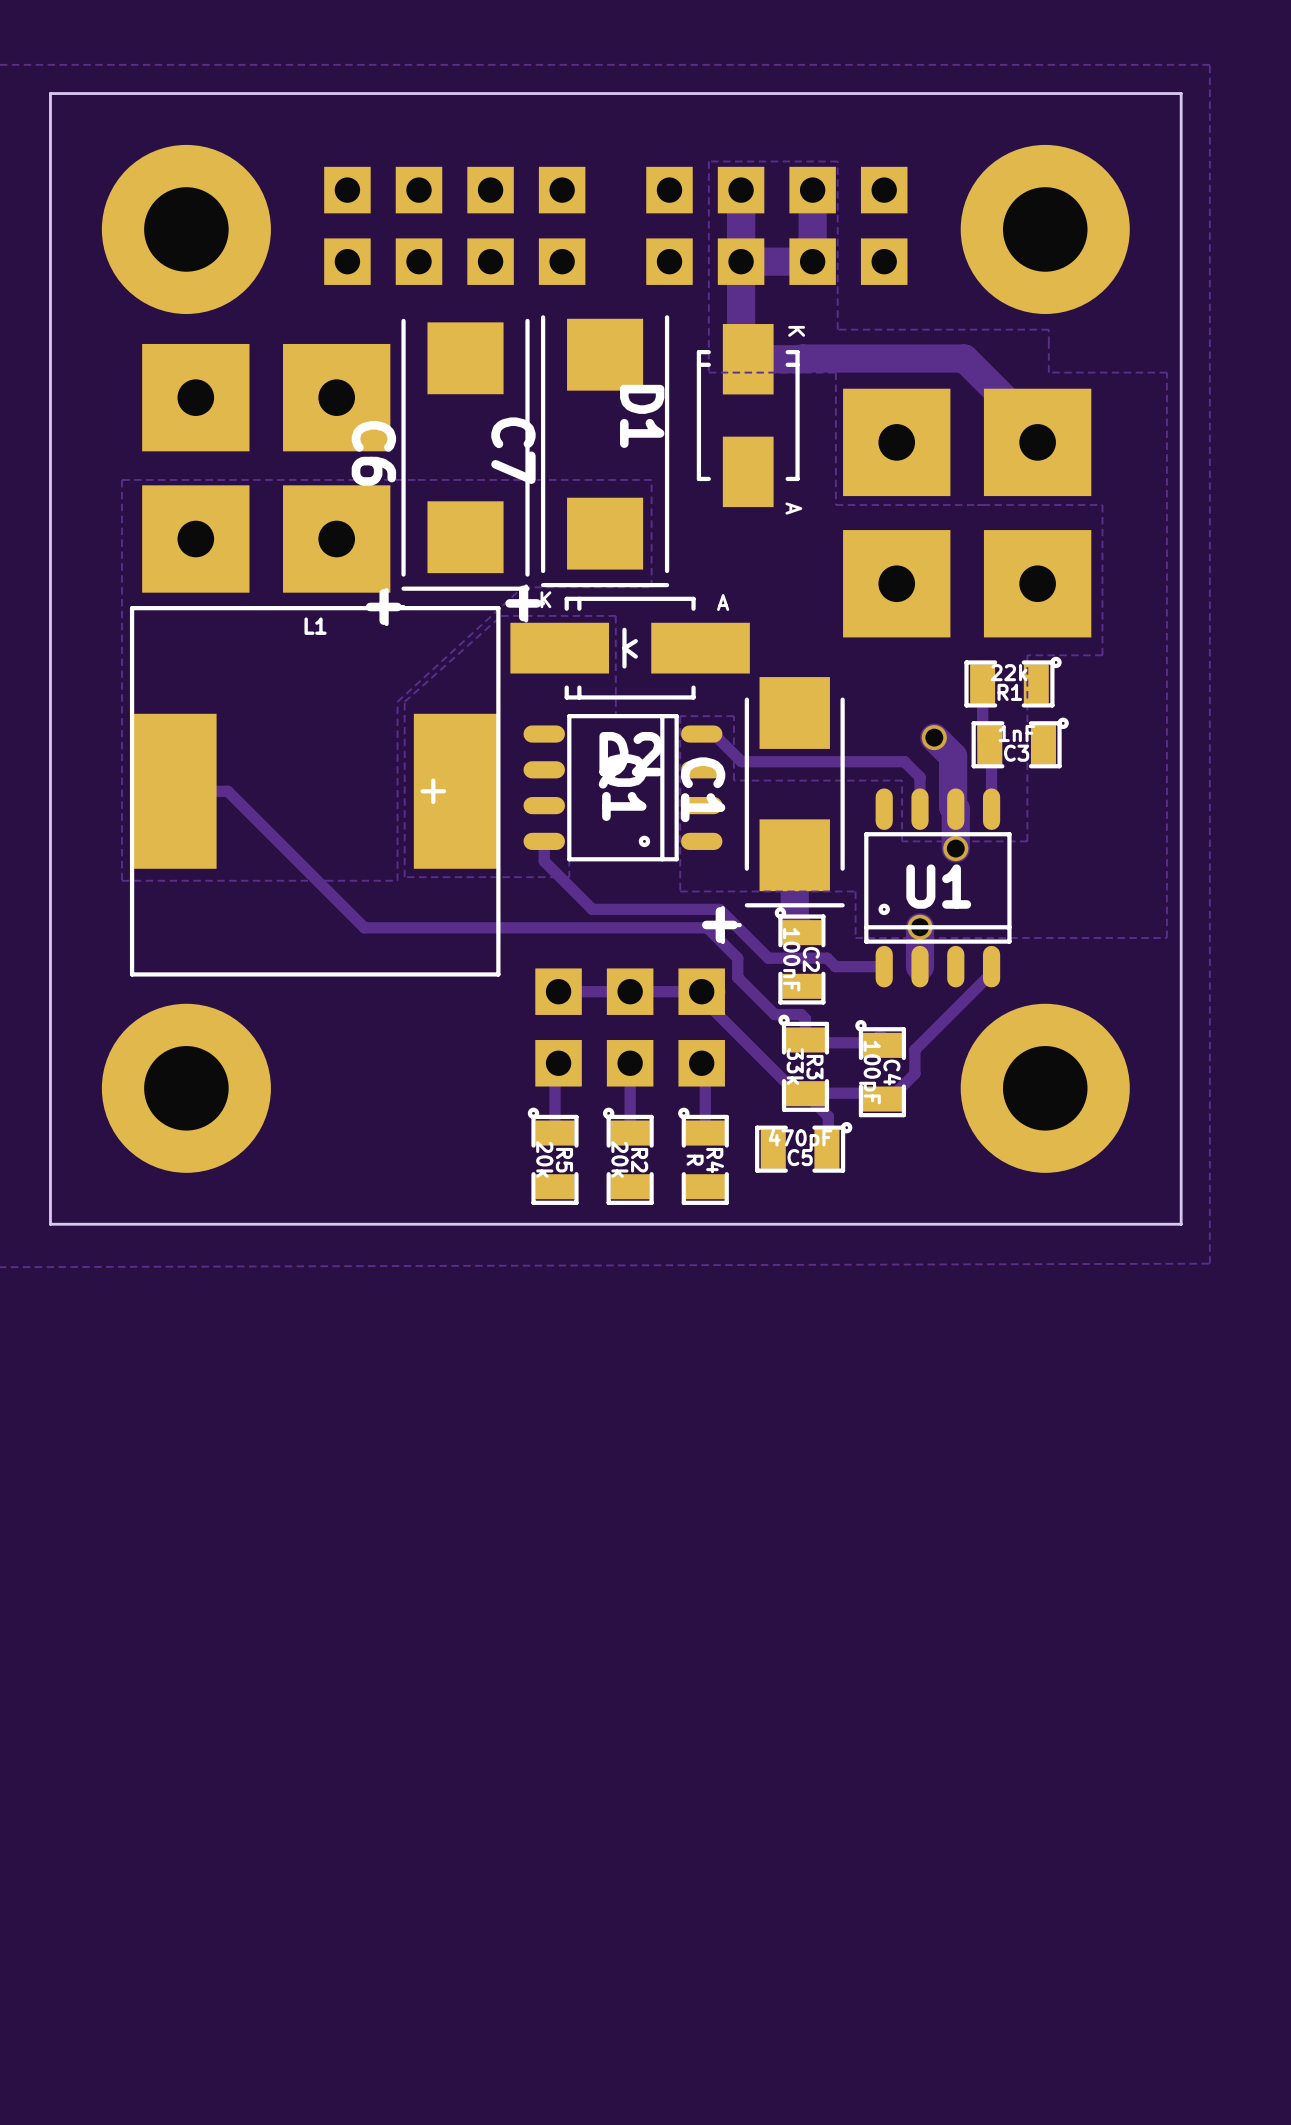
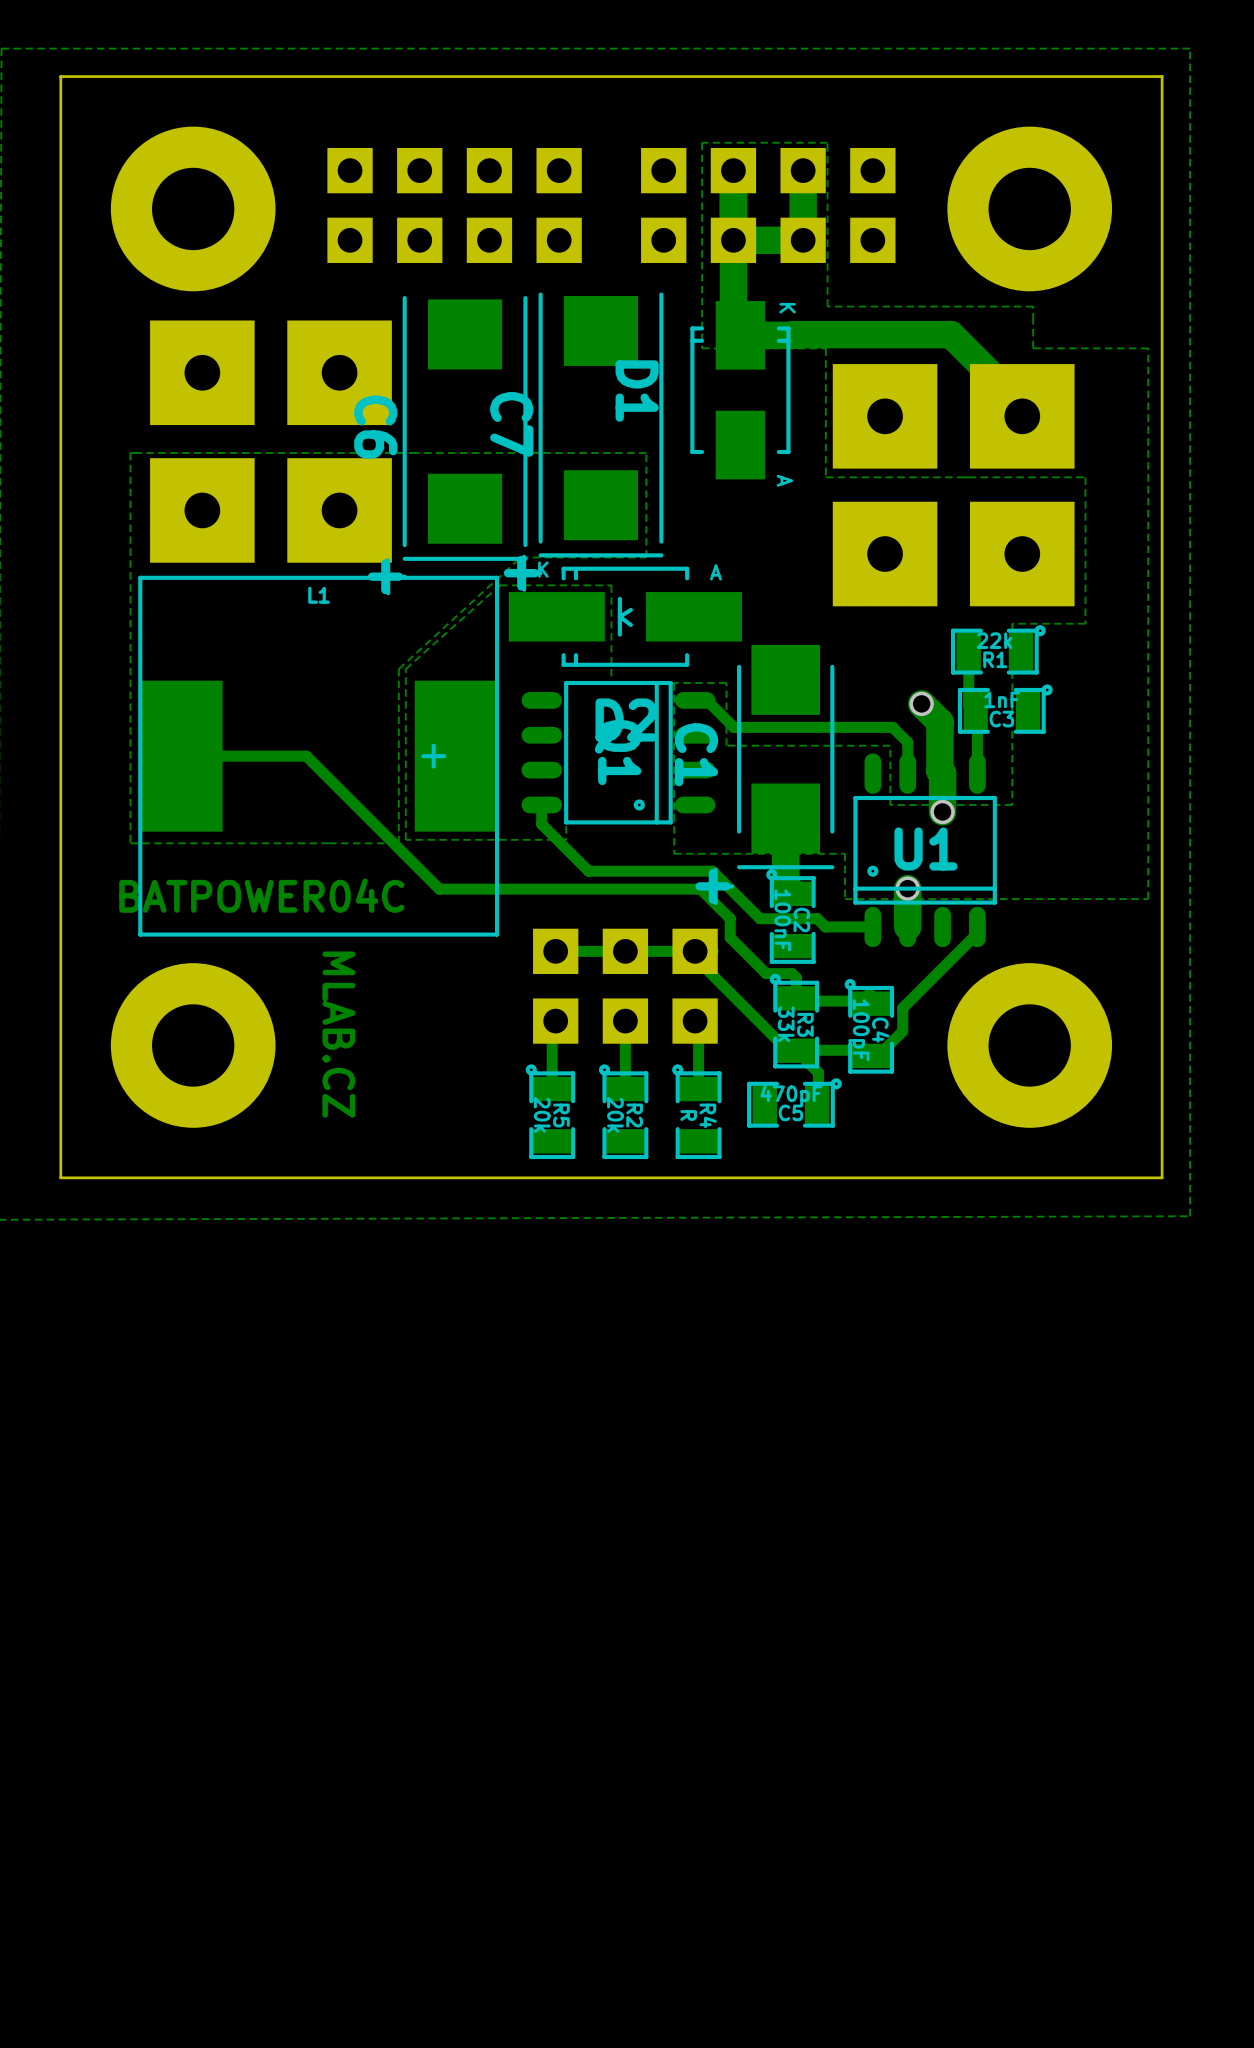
track: (227, 791) (364, 927) (439, 927) -> (233, 756) (306, 756) (439, 889)
text: none -> BATPOWER04C (261, 895)
text: none -> MLAB.CZ (338, 1034)

